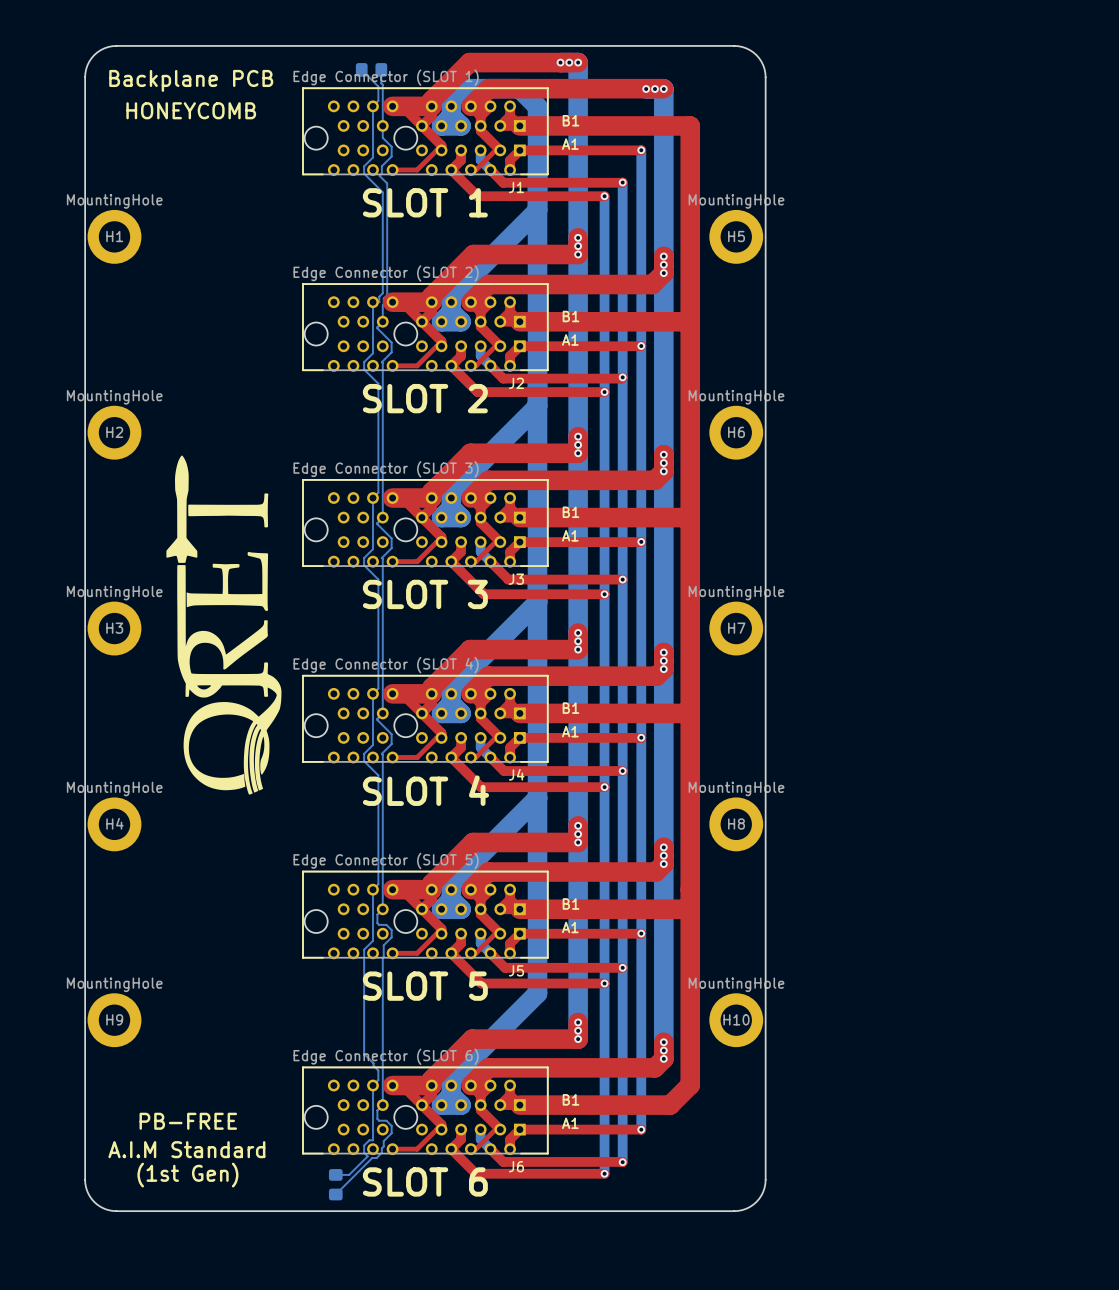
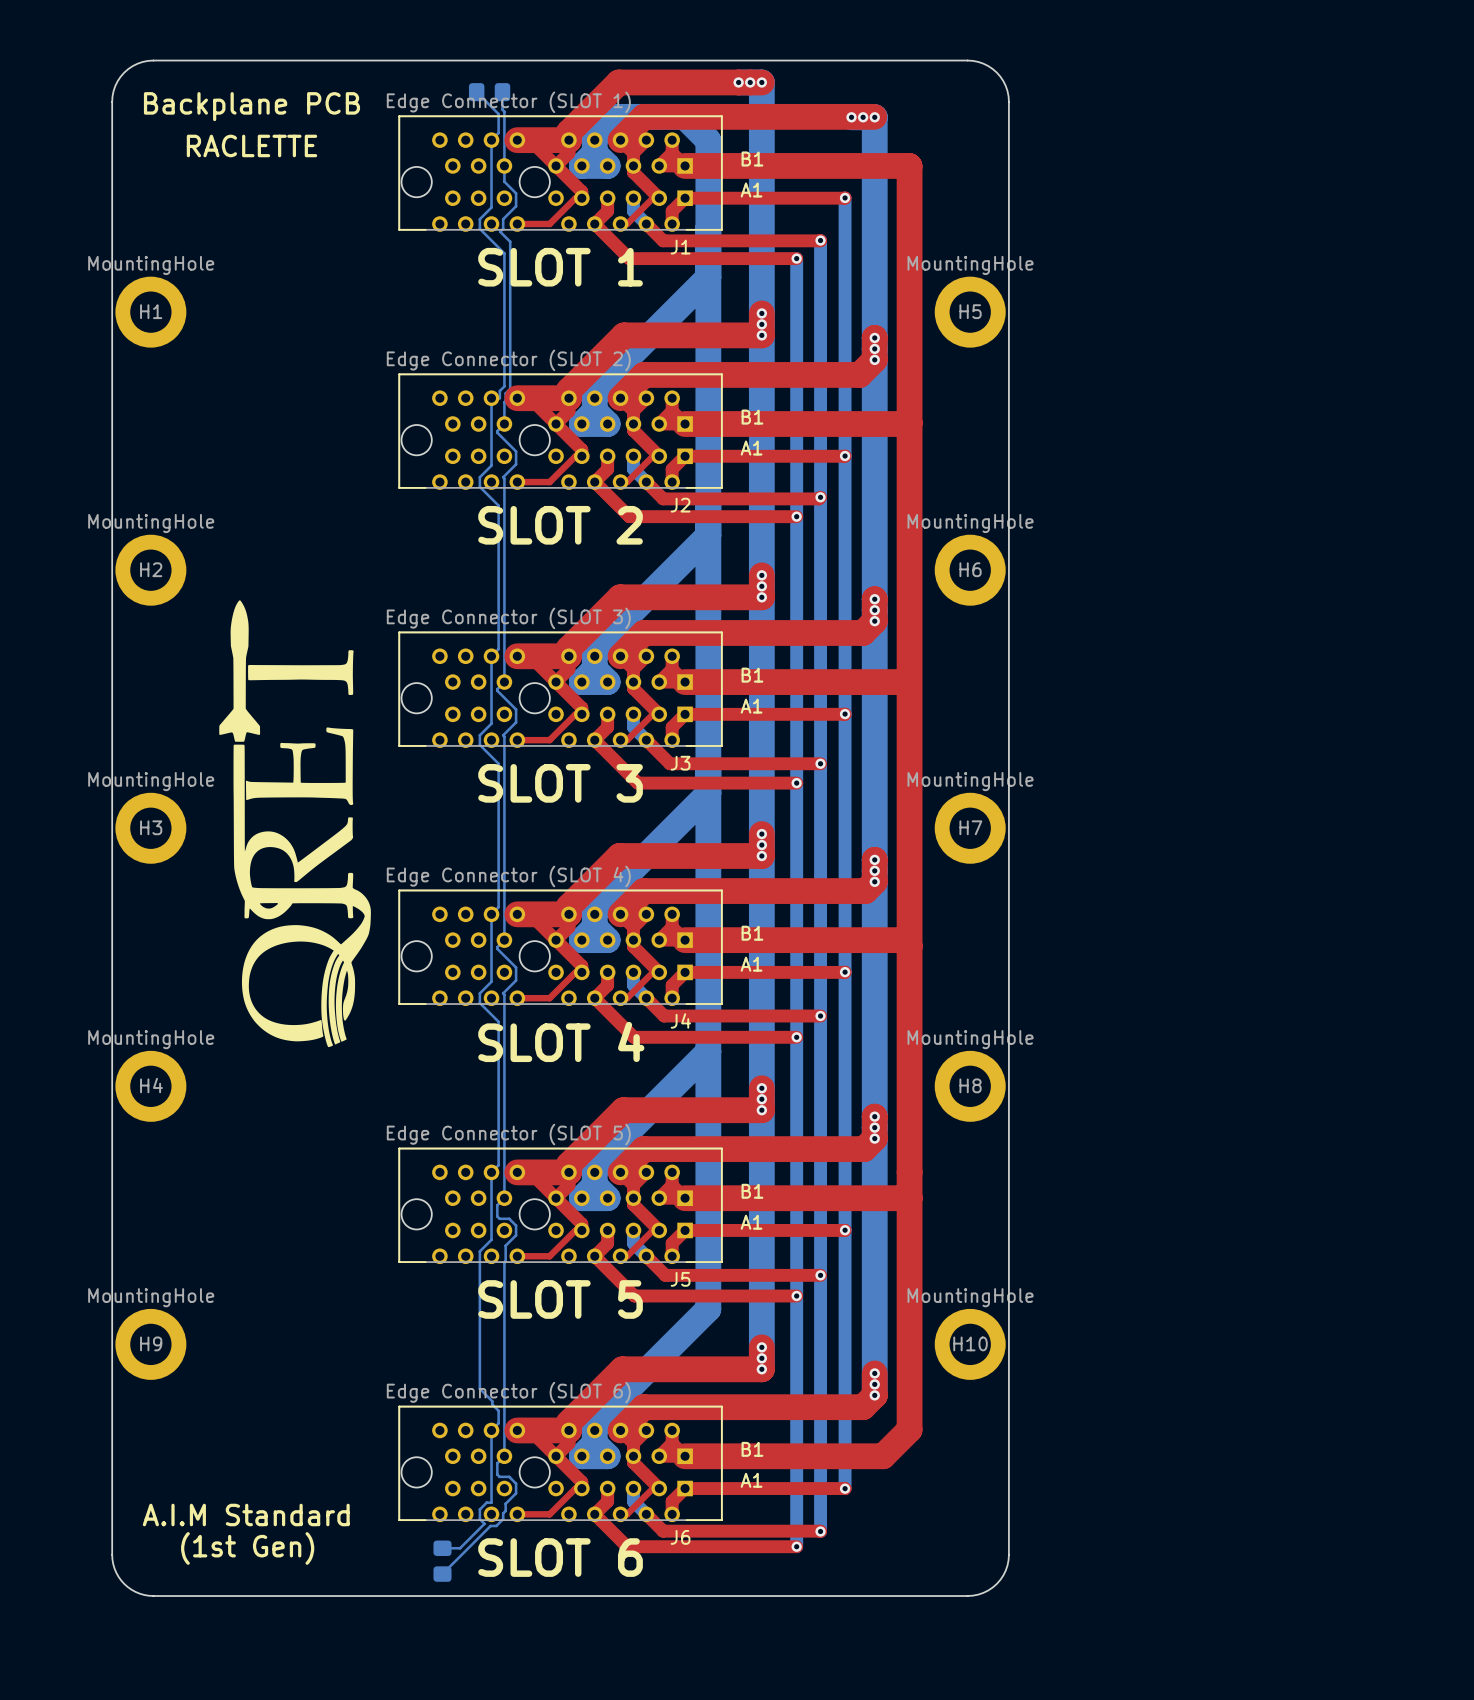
text: HONEYCOMB (191, 110) -> RACLETTE (251, 145)
text: PB-FREE (188, 1121) -> none

